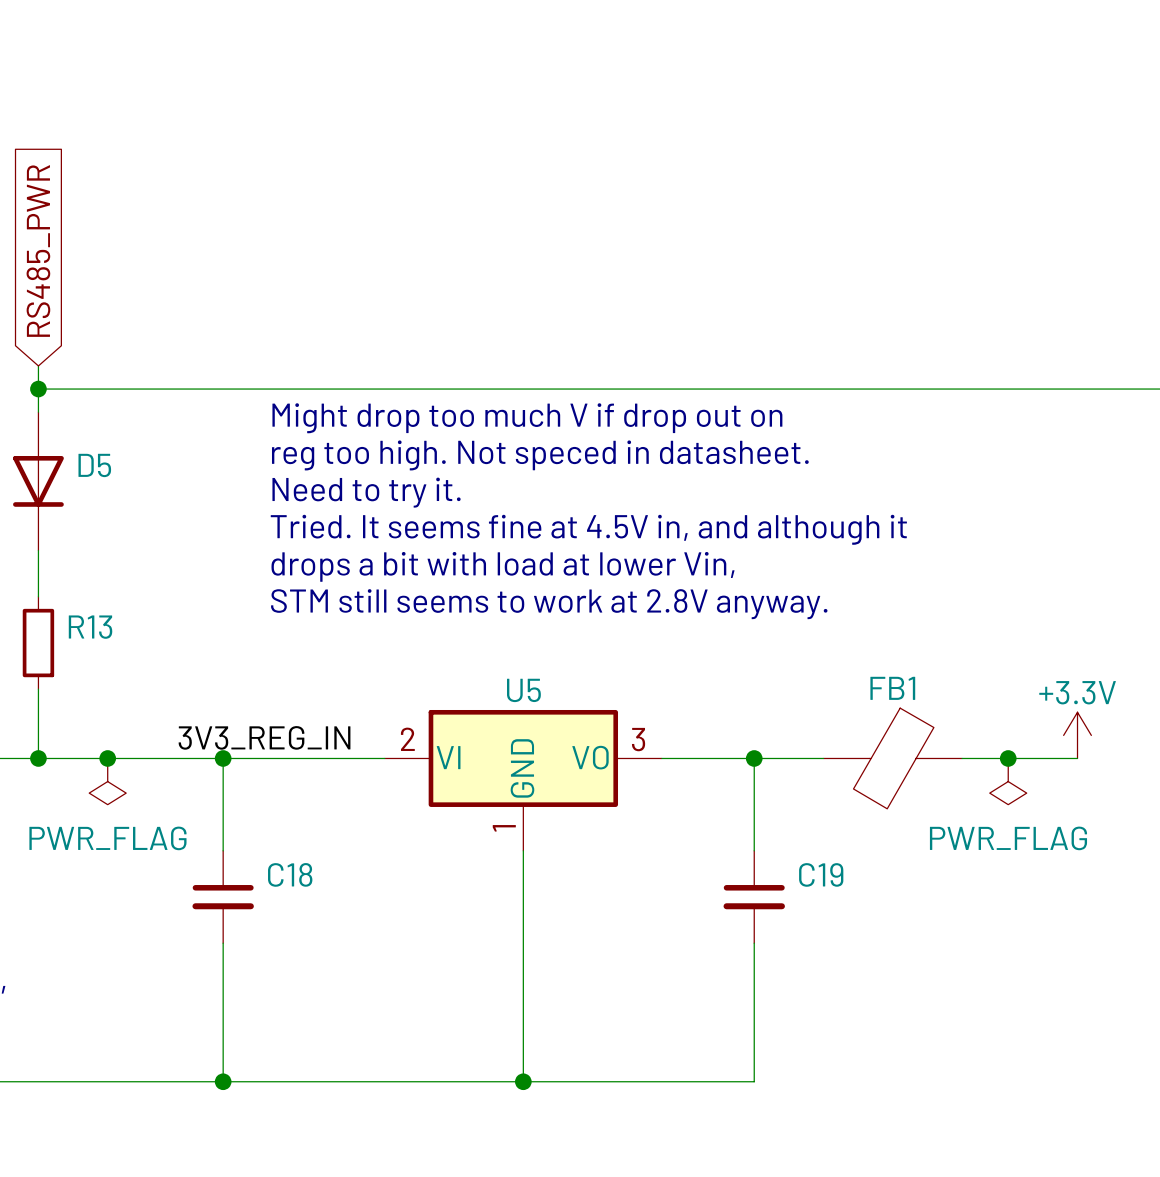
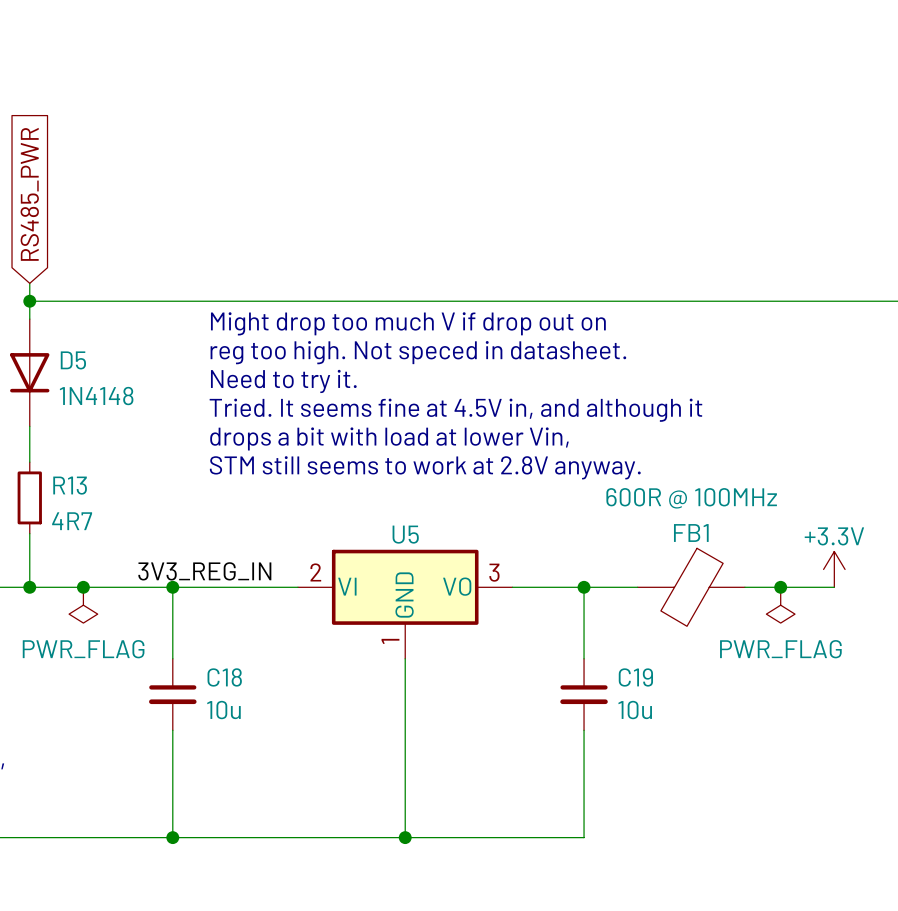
D5 value: none -> 1N4148 (96, 396)
FB1 value: none -> 600R @ 100MHz (691, 498)
R13 value: none -> 4R7 (72, 521)
C18 value: none -> 10u (223, 710)
C19 value: none -> 10u (635, 710)

